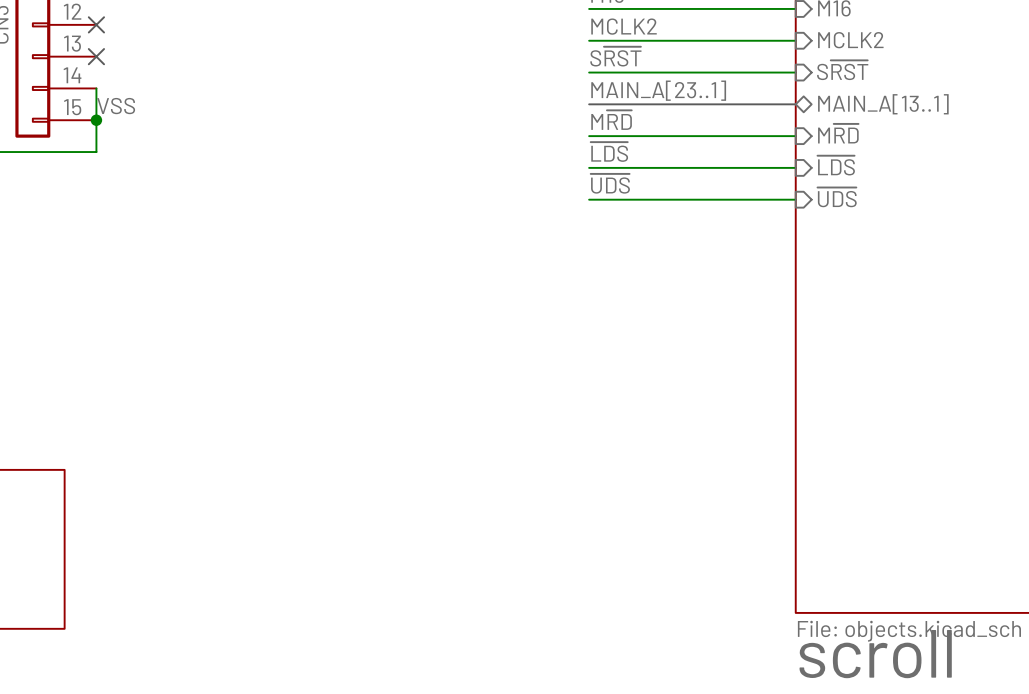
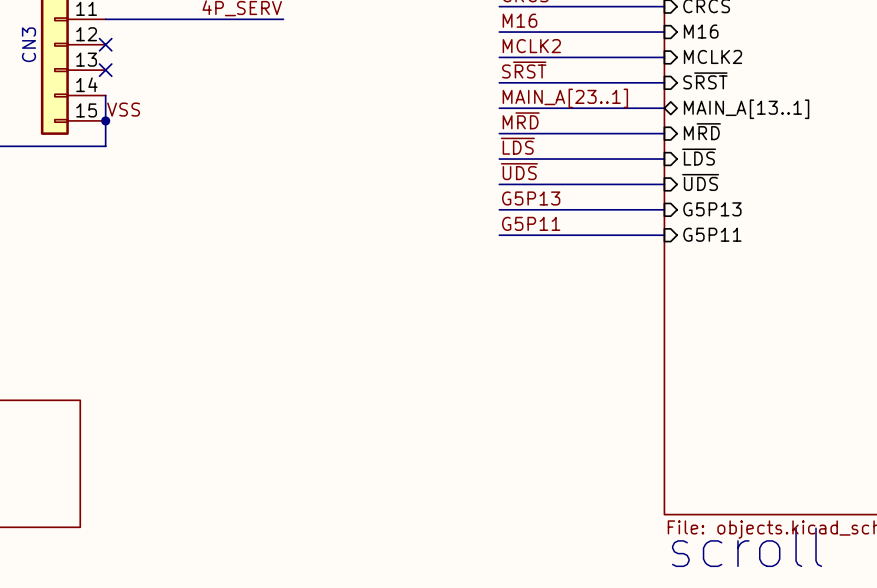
label: none -> G5P13 (531, 198)
sheet pin: none -> G5P13 (712, 209)
wire: none -> (499, 209) (664, 209)
label: none -> G5P11 (531, 223)
sheet pin: none -> G5P11 (712, 234)
wire: none -> (499, 235) (664, 235)

